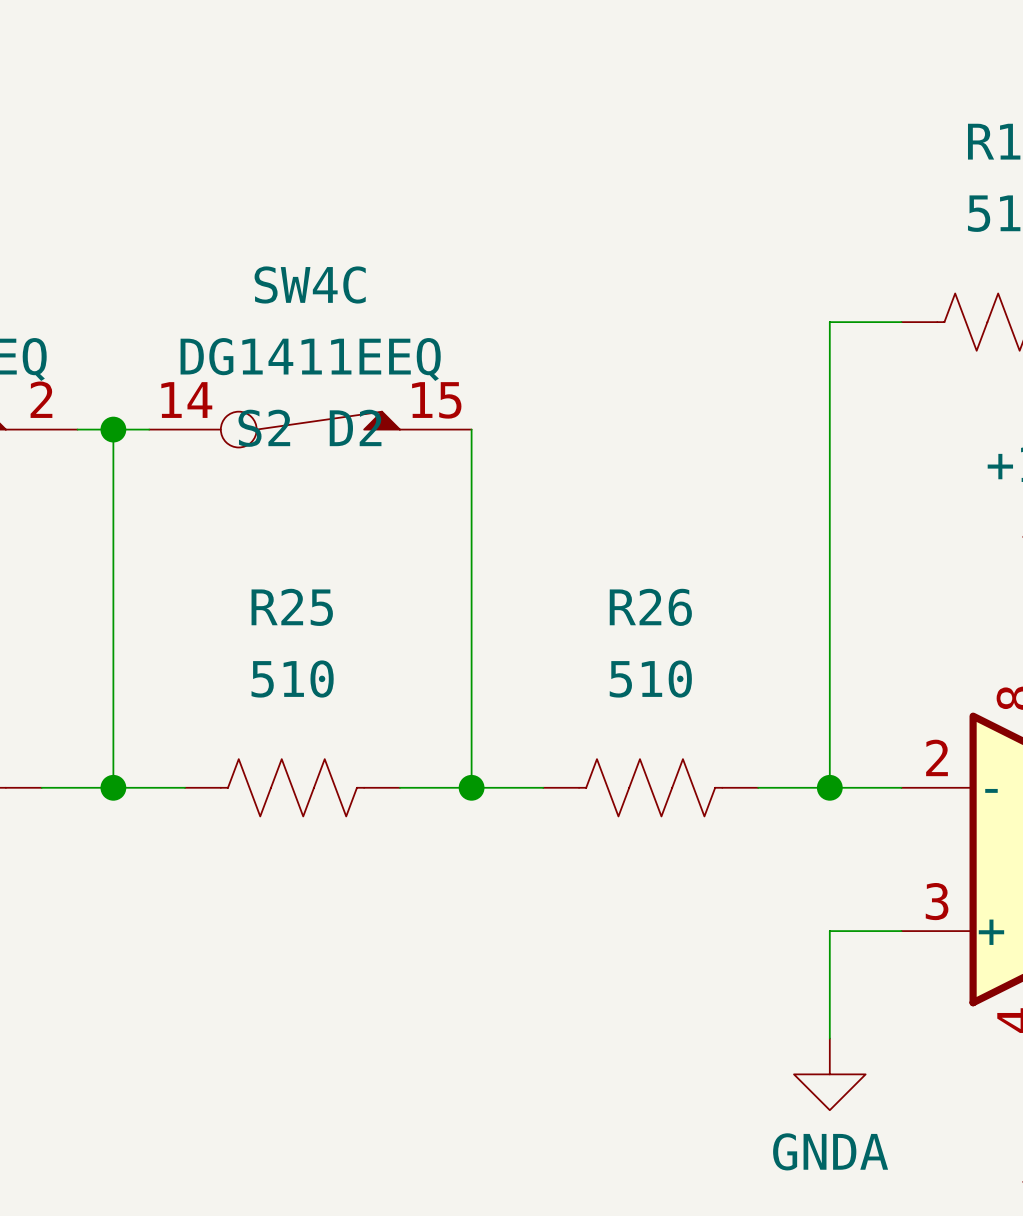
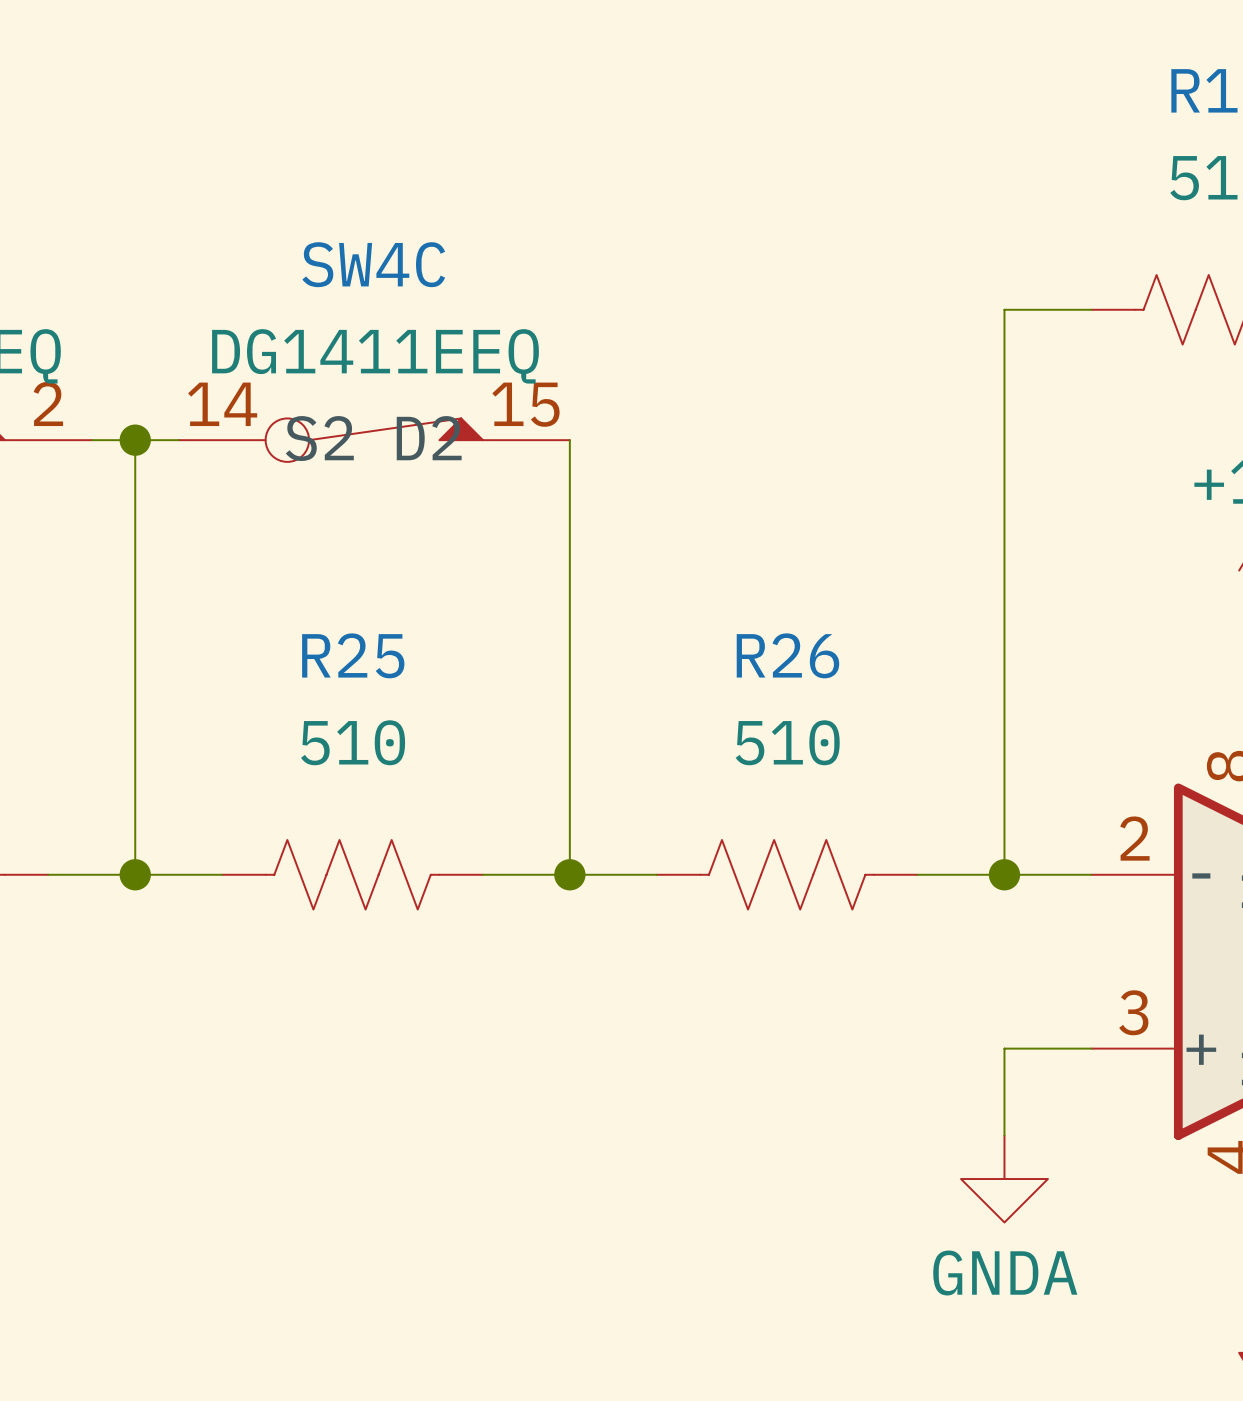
power symbol position: GNDA (829, 1074) -> GNDA (1004, 1179)

